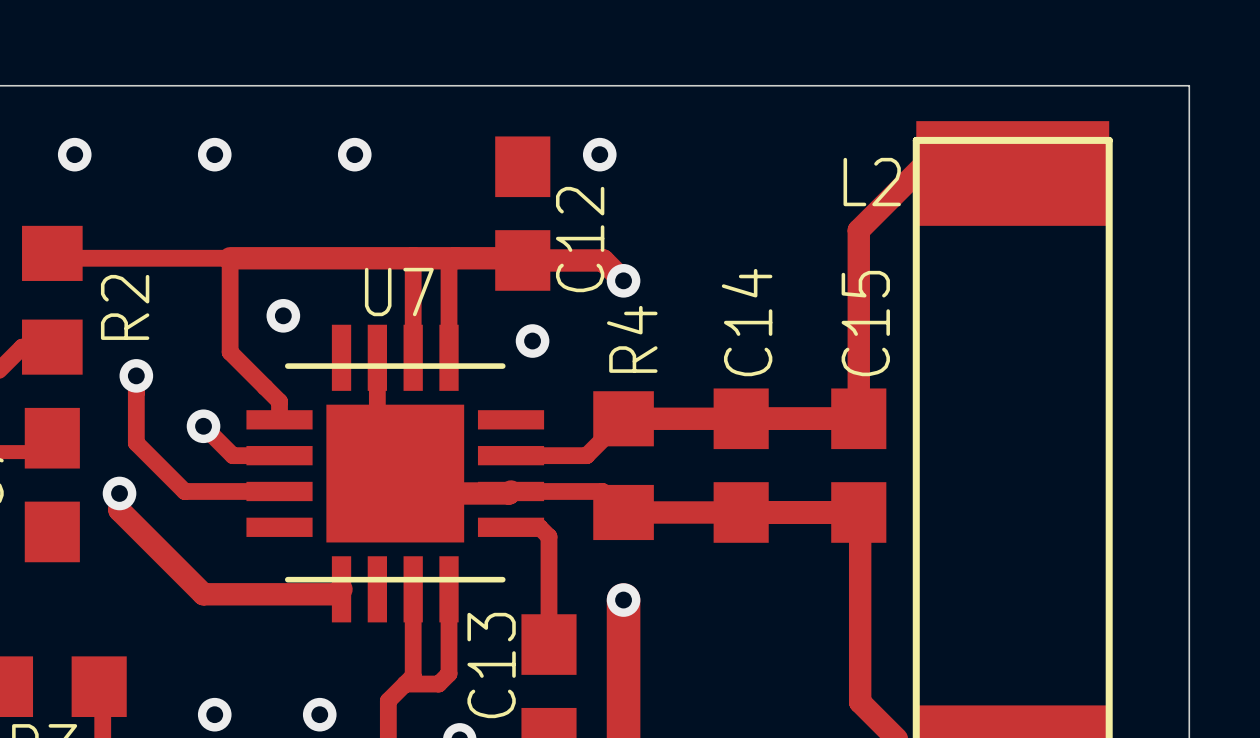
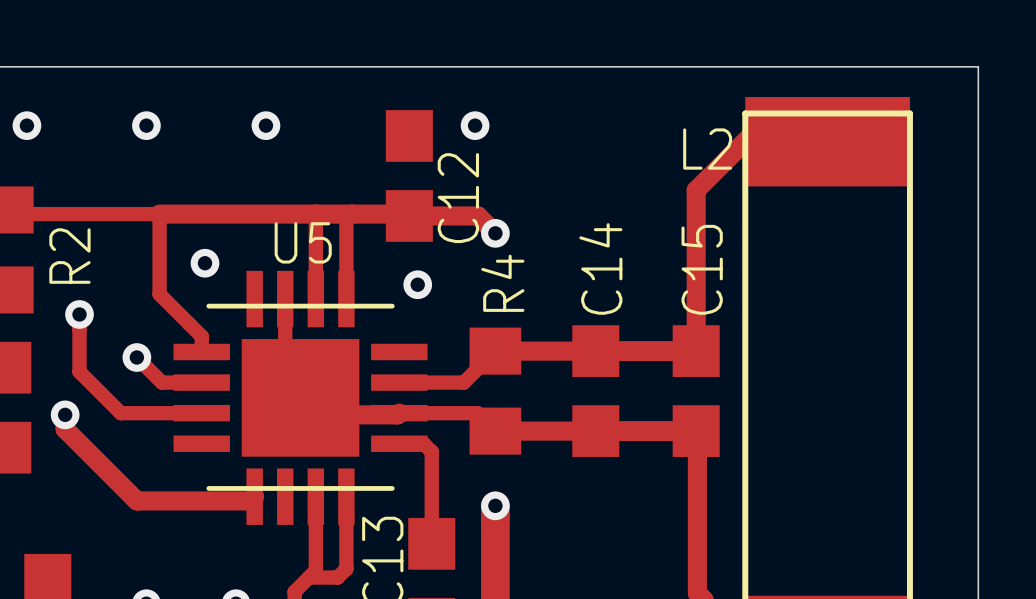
U7 name: U7 (399, 292) -> U5 (303, 242)

